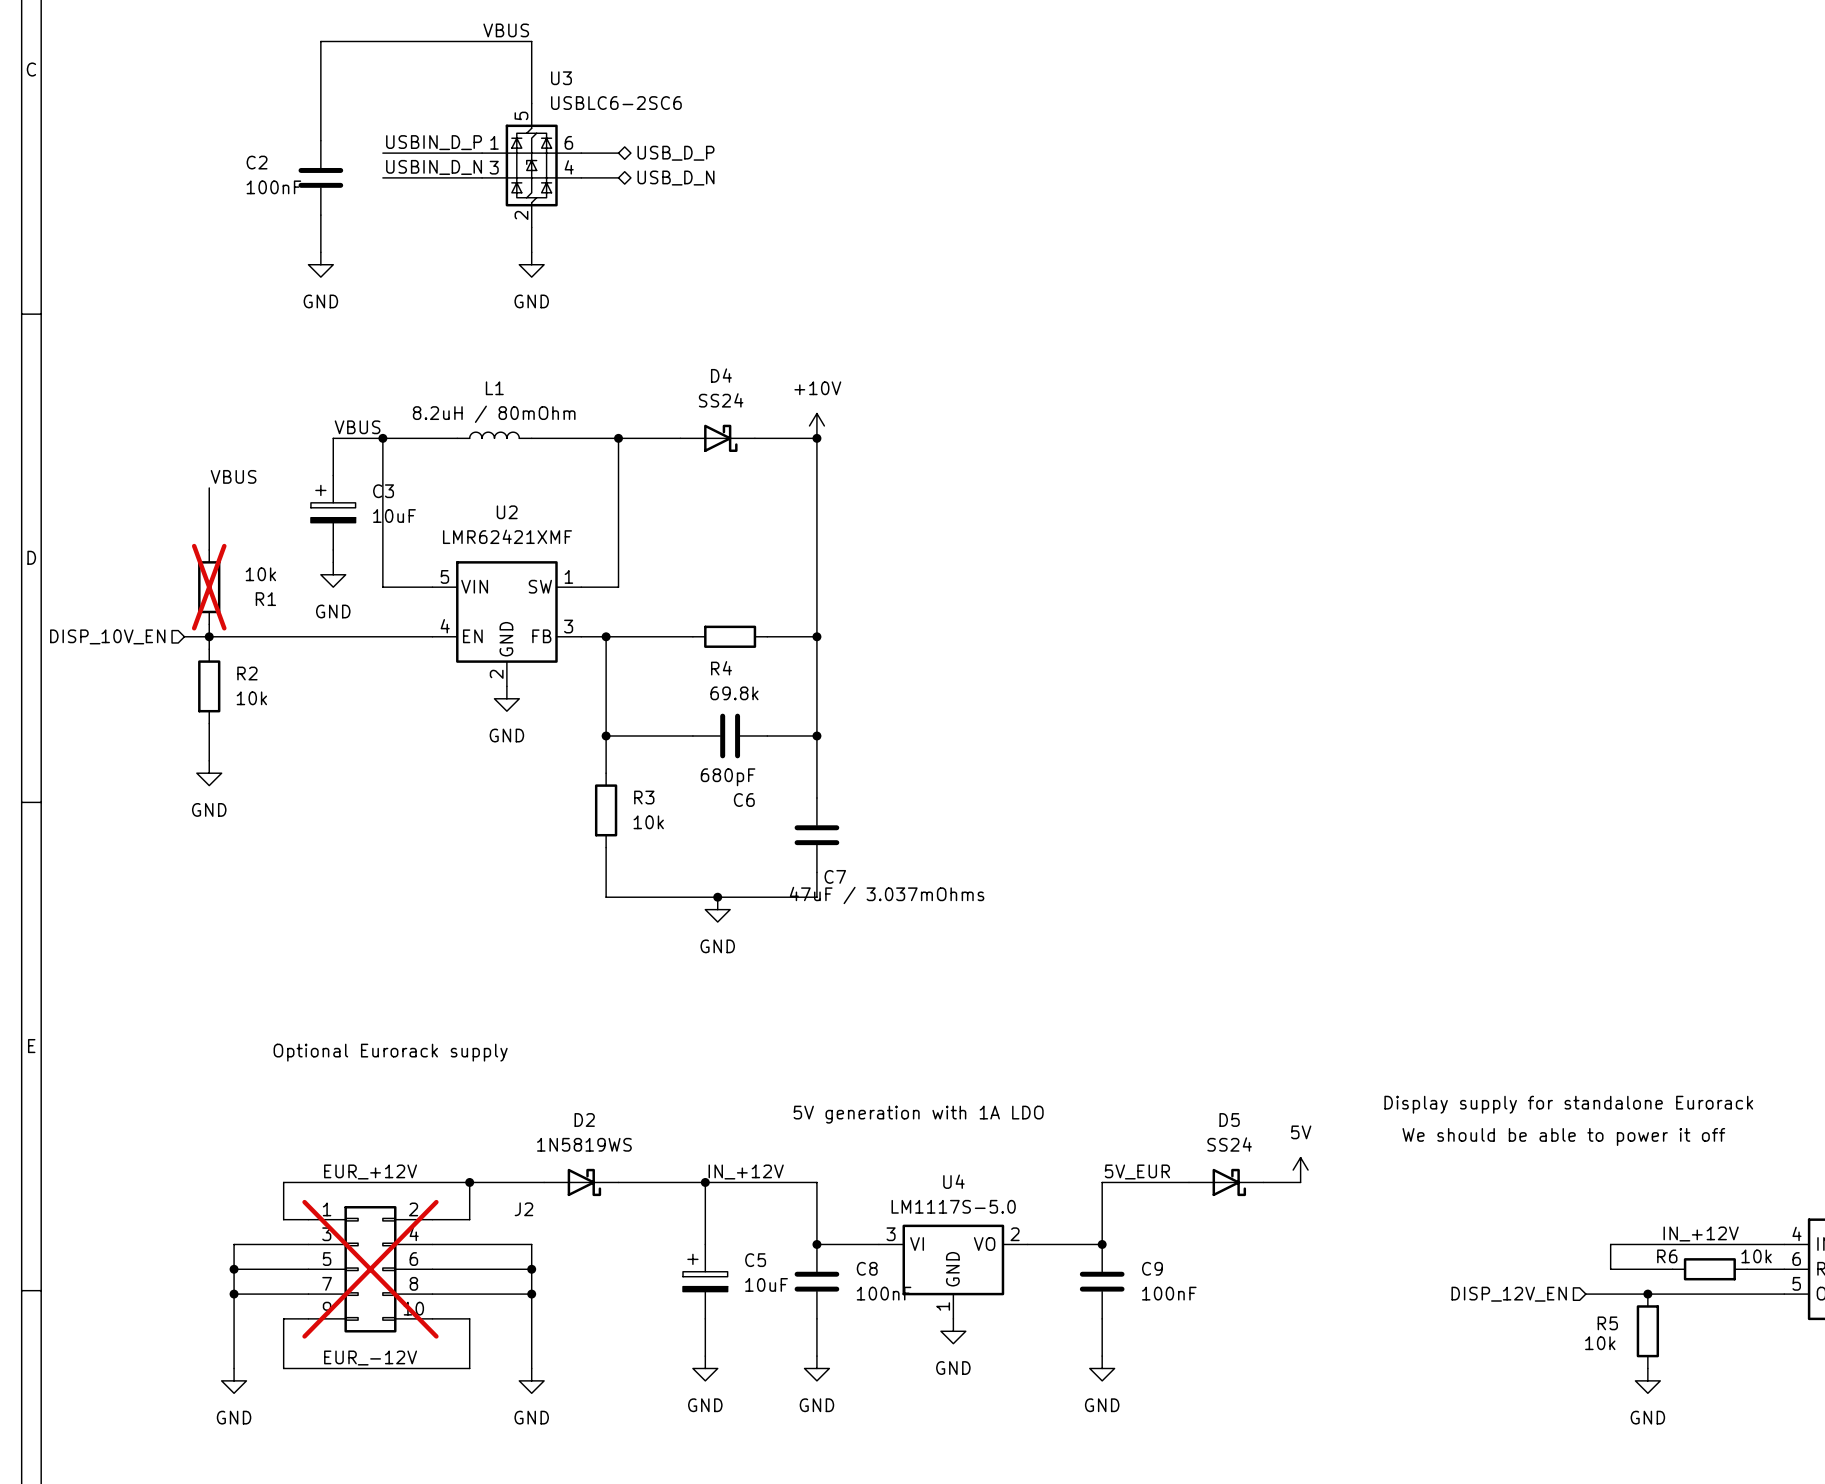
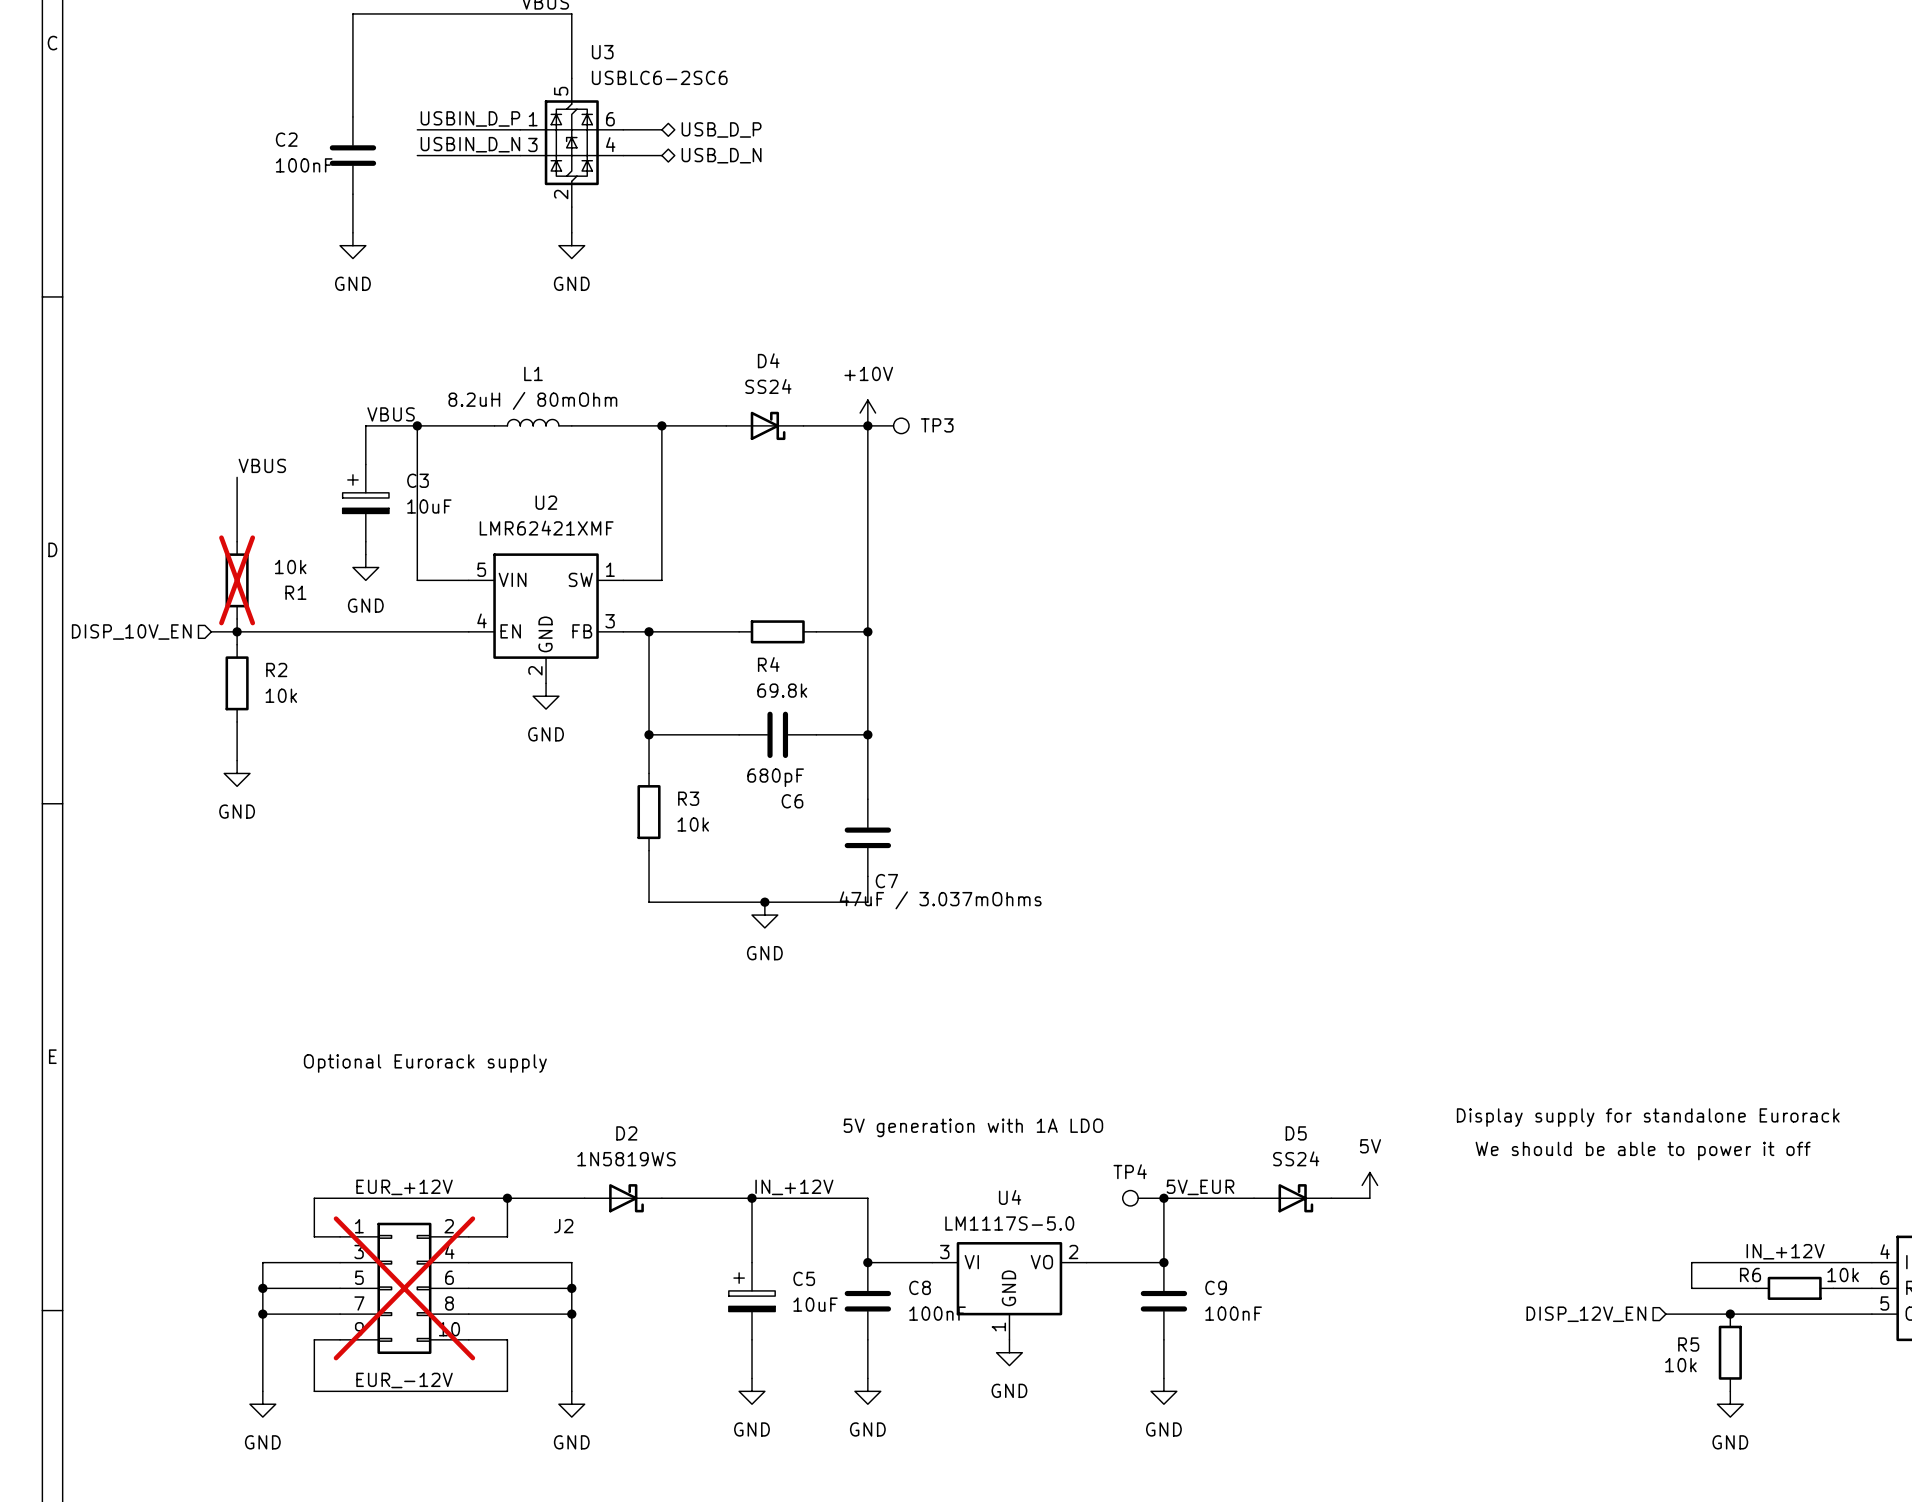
TP3: none -> (888, 425)
TP4: none -> (1143, 1198)
junction: none -> (1163, 1198)

